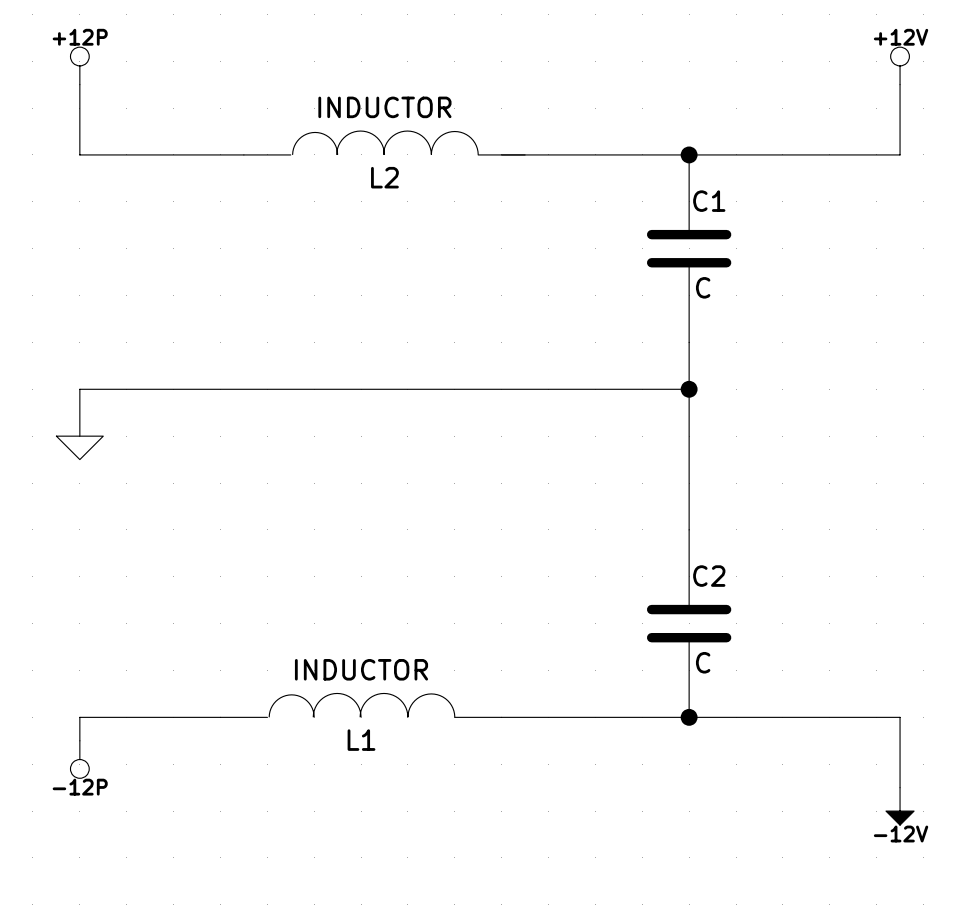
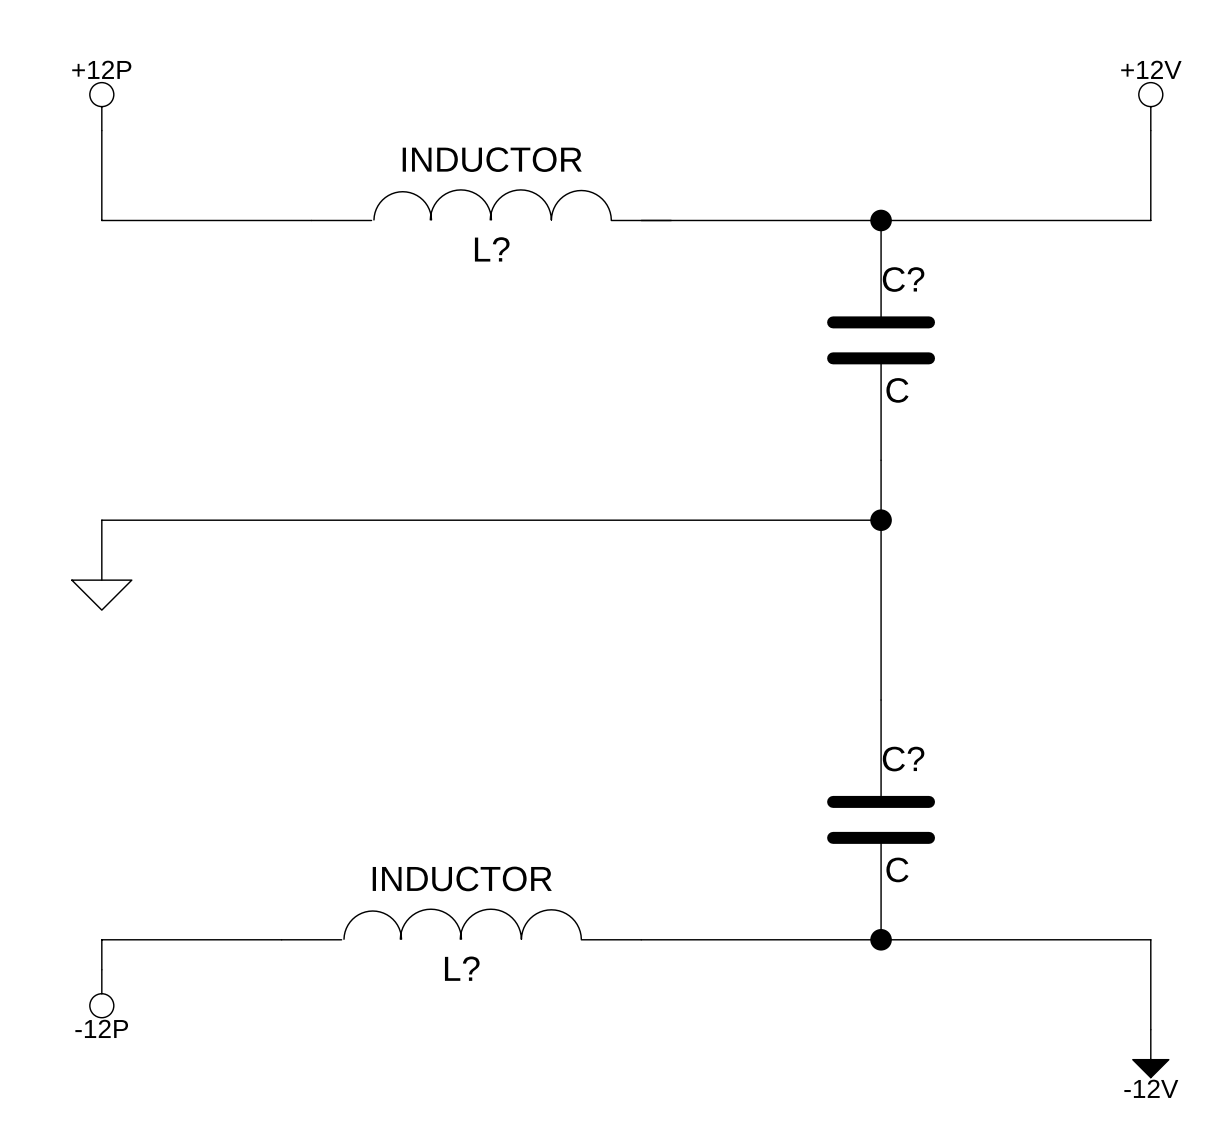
L2 name: L2 (384, 177) -> L? (492, 249)
C1 name: C1 (709, 201) -> C? (903, 279)
C2 name: C2 (709, 576) -> C? (903, 759)
L1 name: L1 (361, 740) -> L? (462, 968)

